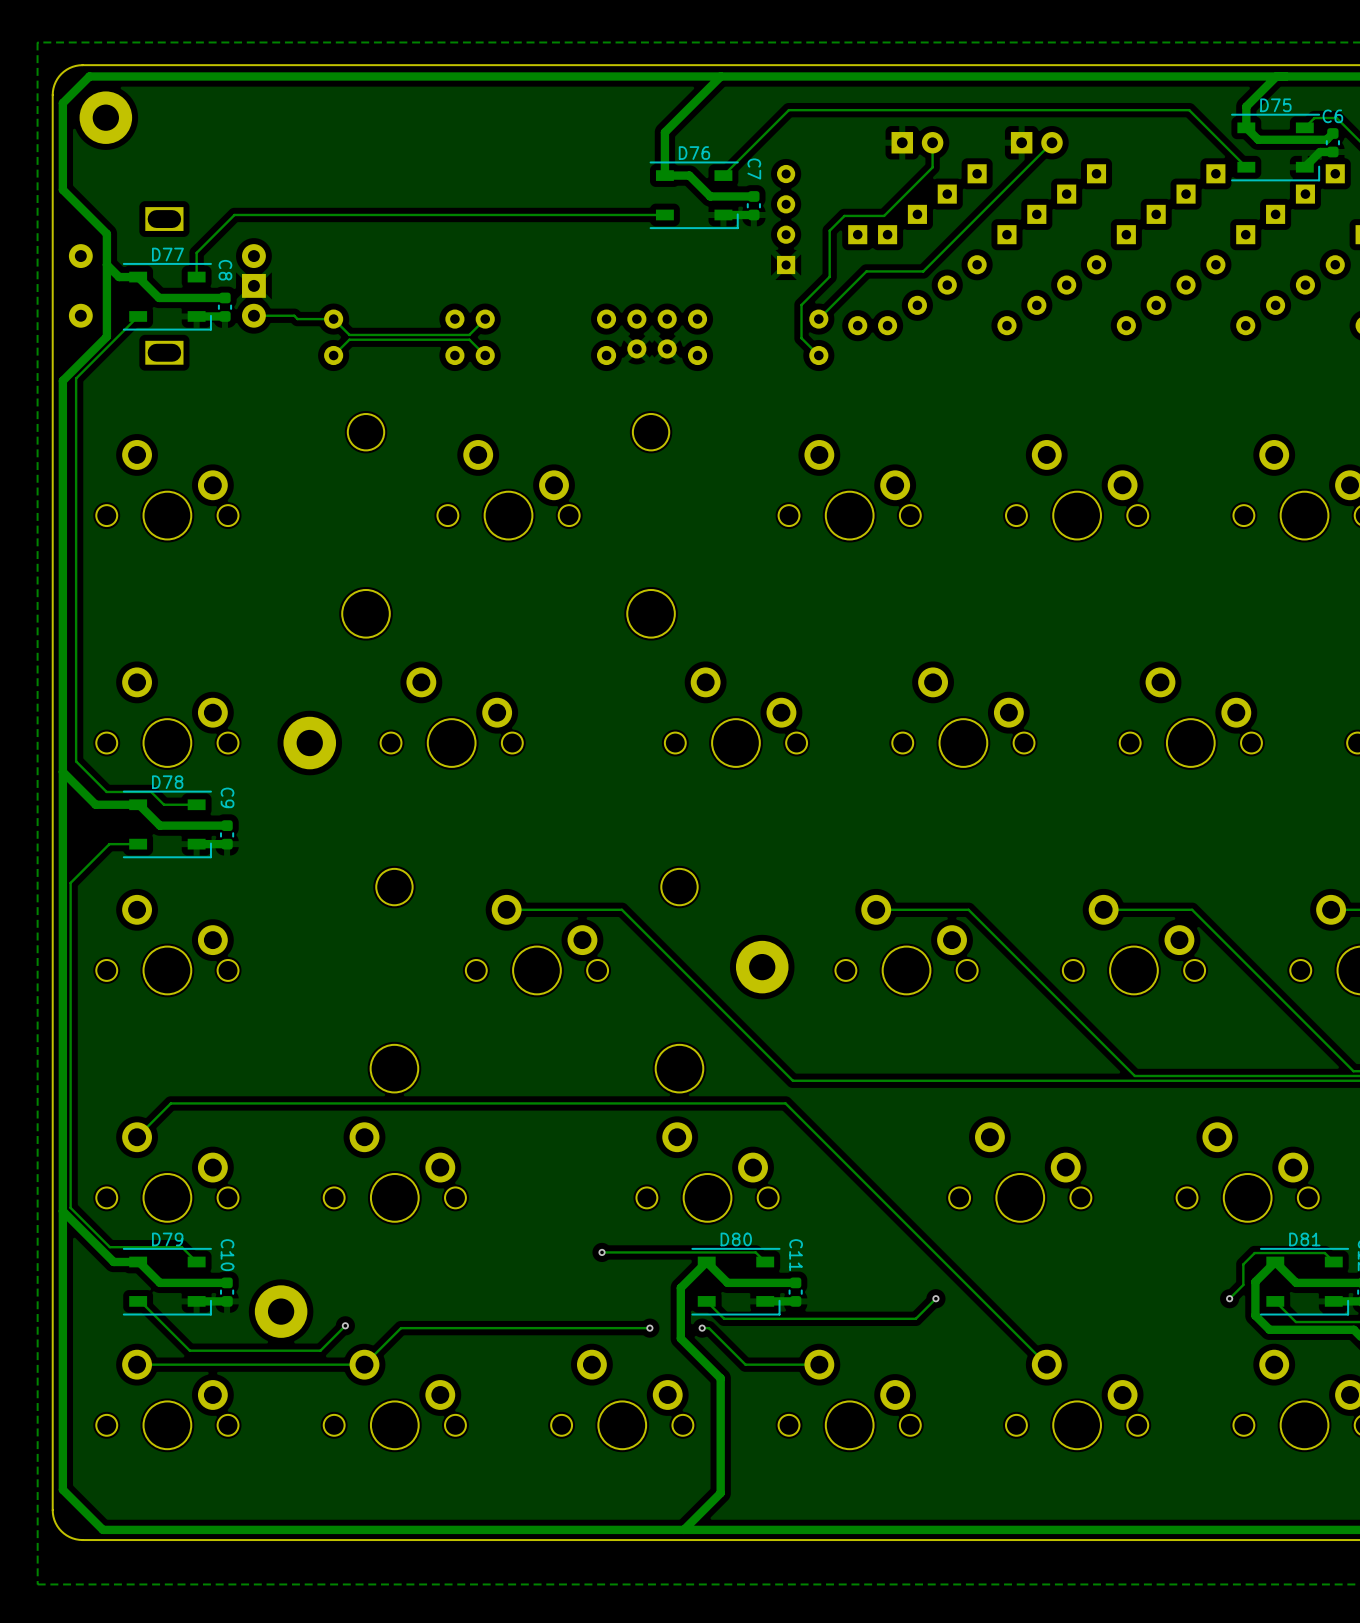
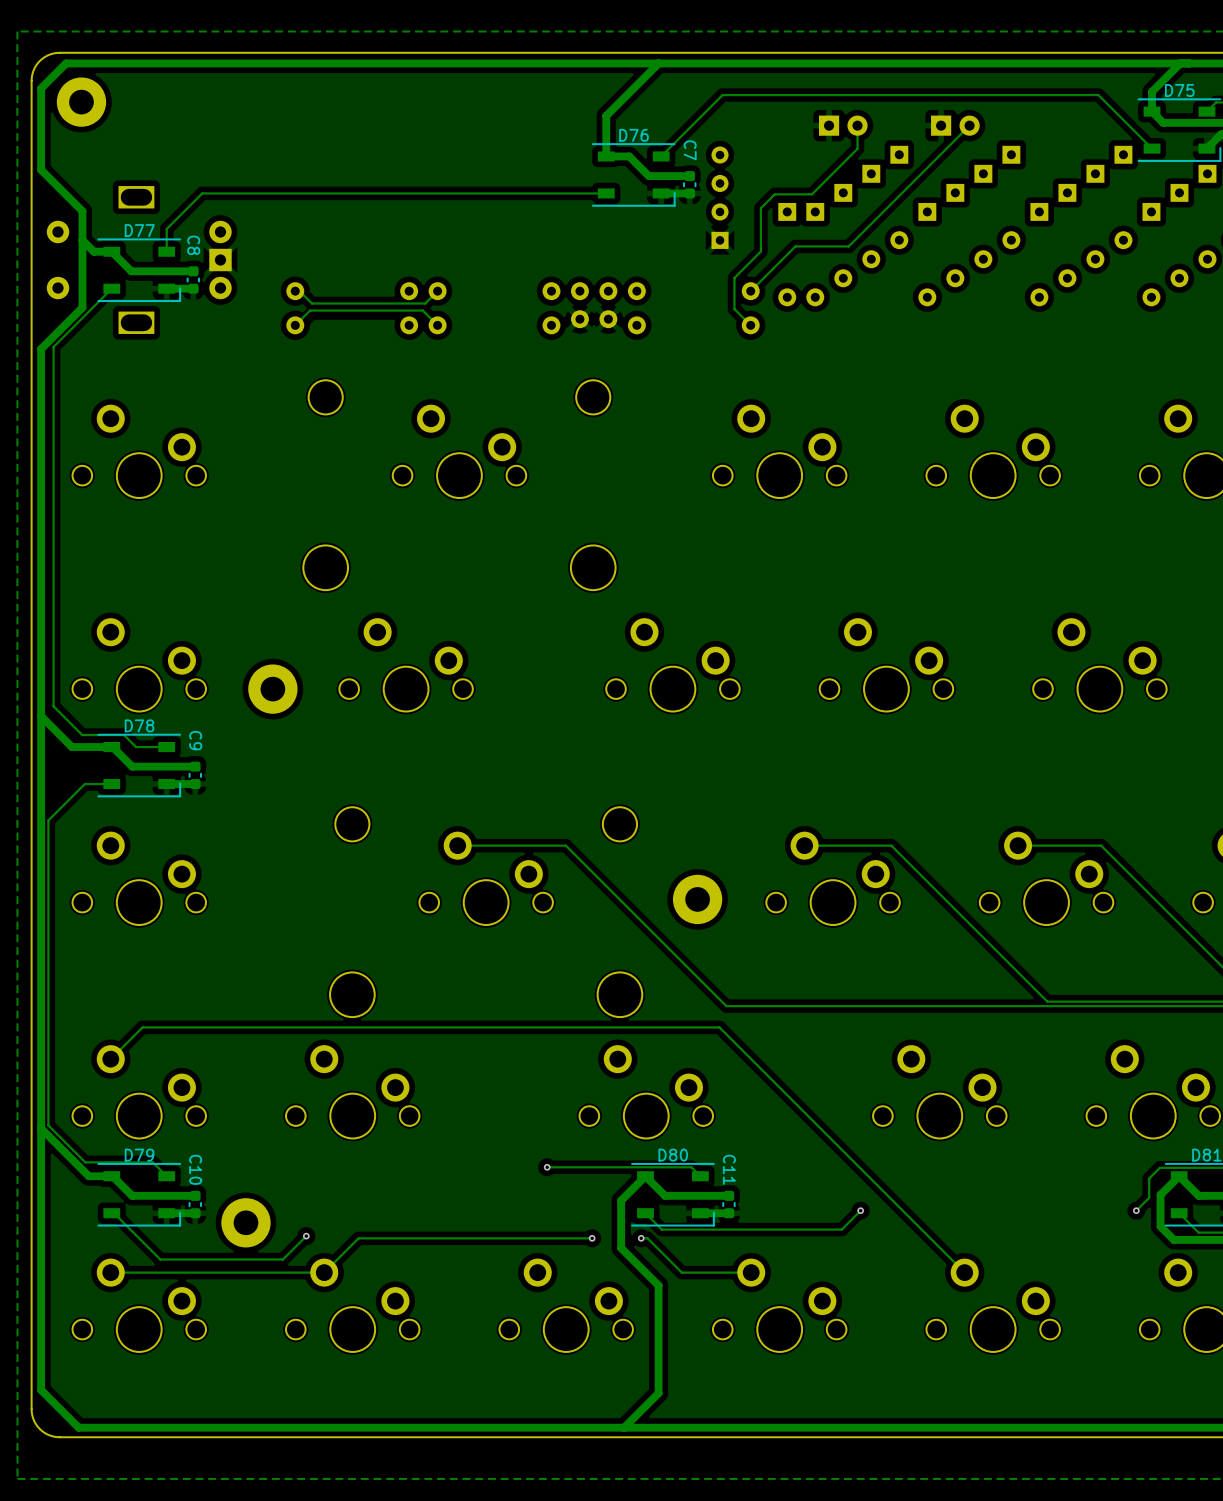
track: (253, 315) (294, 315) (297, 319) (333, 319) (349, 334) (469, 334) (472, 332) -> (299, 291) (311, 303) (425, 303)

